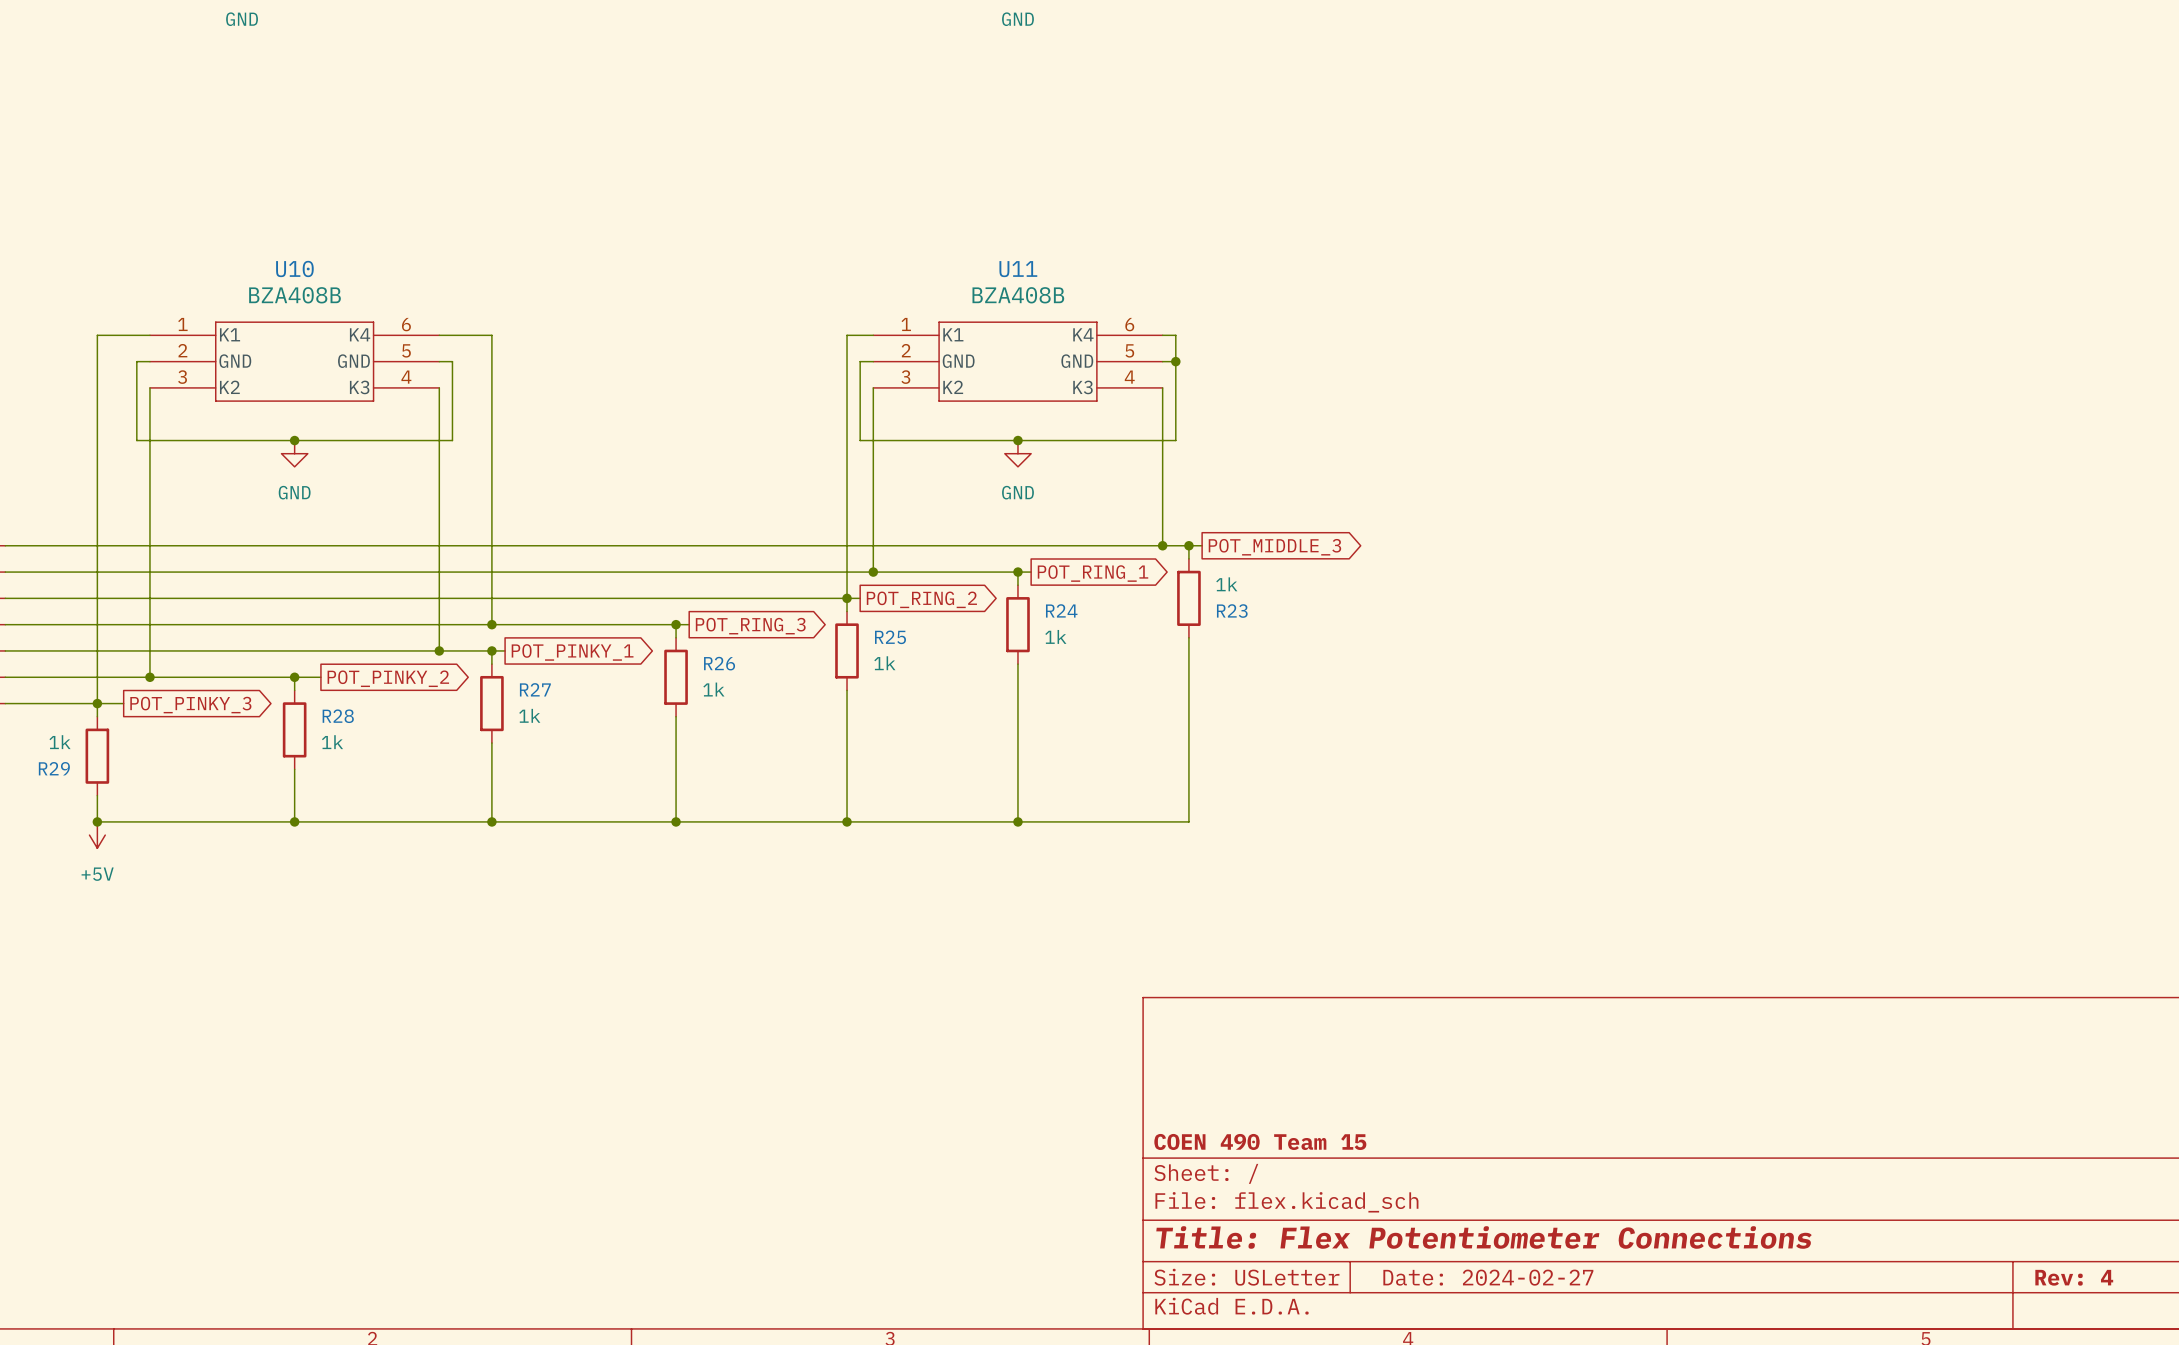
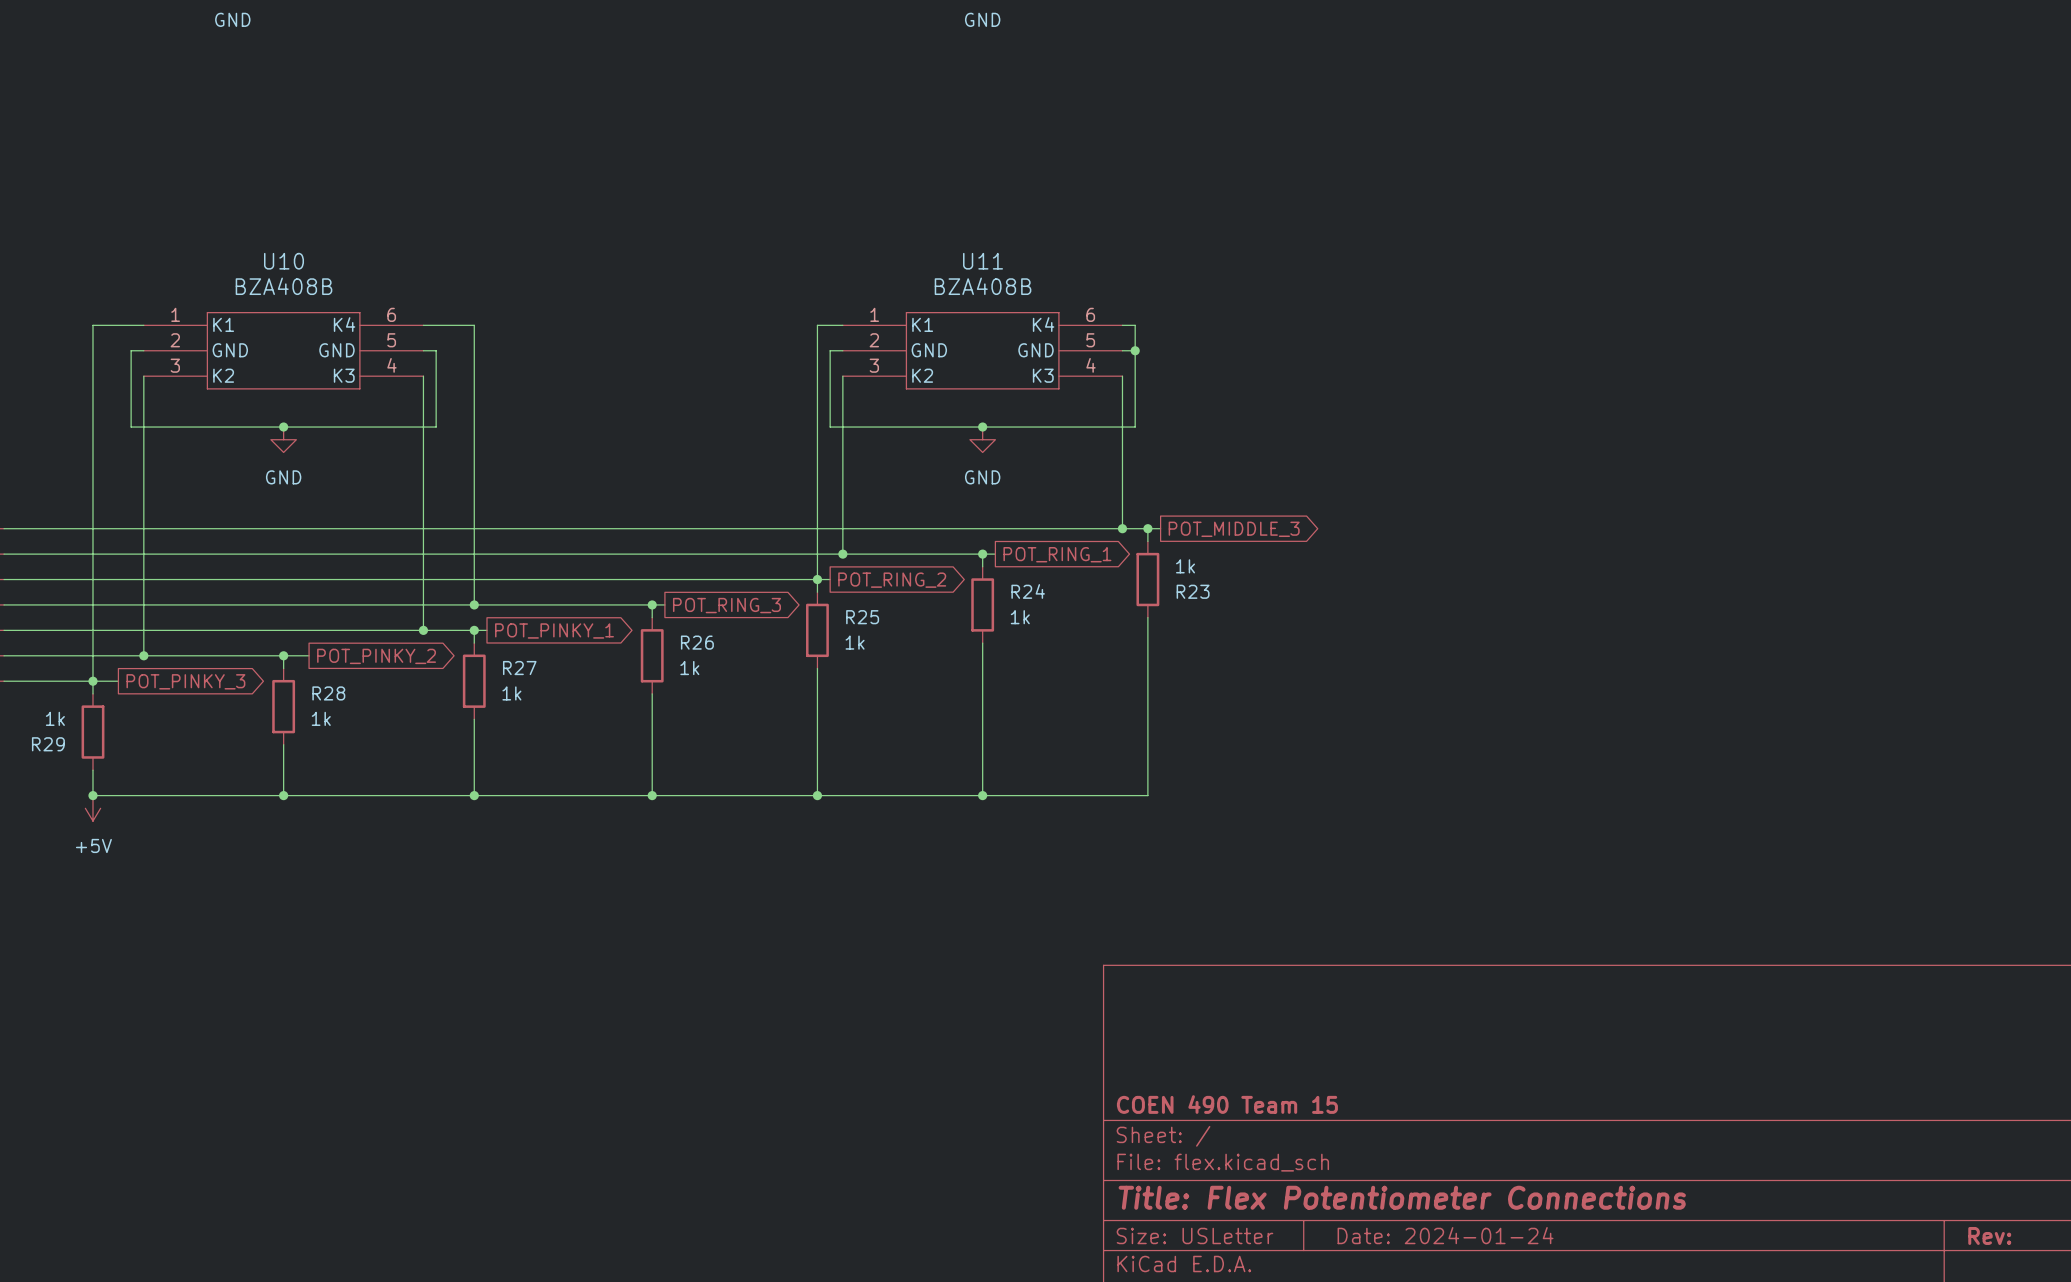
title block: Date: 2024-02-27 (1488, 1277) -> Date: 2024-01-24 (1445, 1235)
title block: Rev: 4 (2074, 1277) -> Rev: (1989, 1235)

